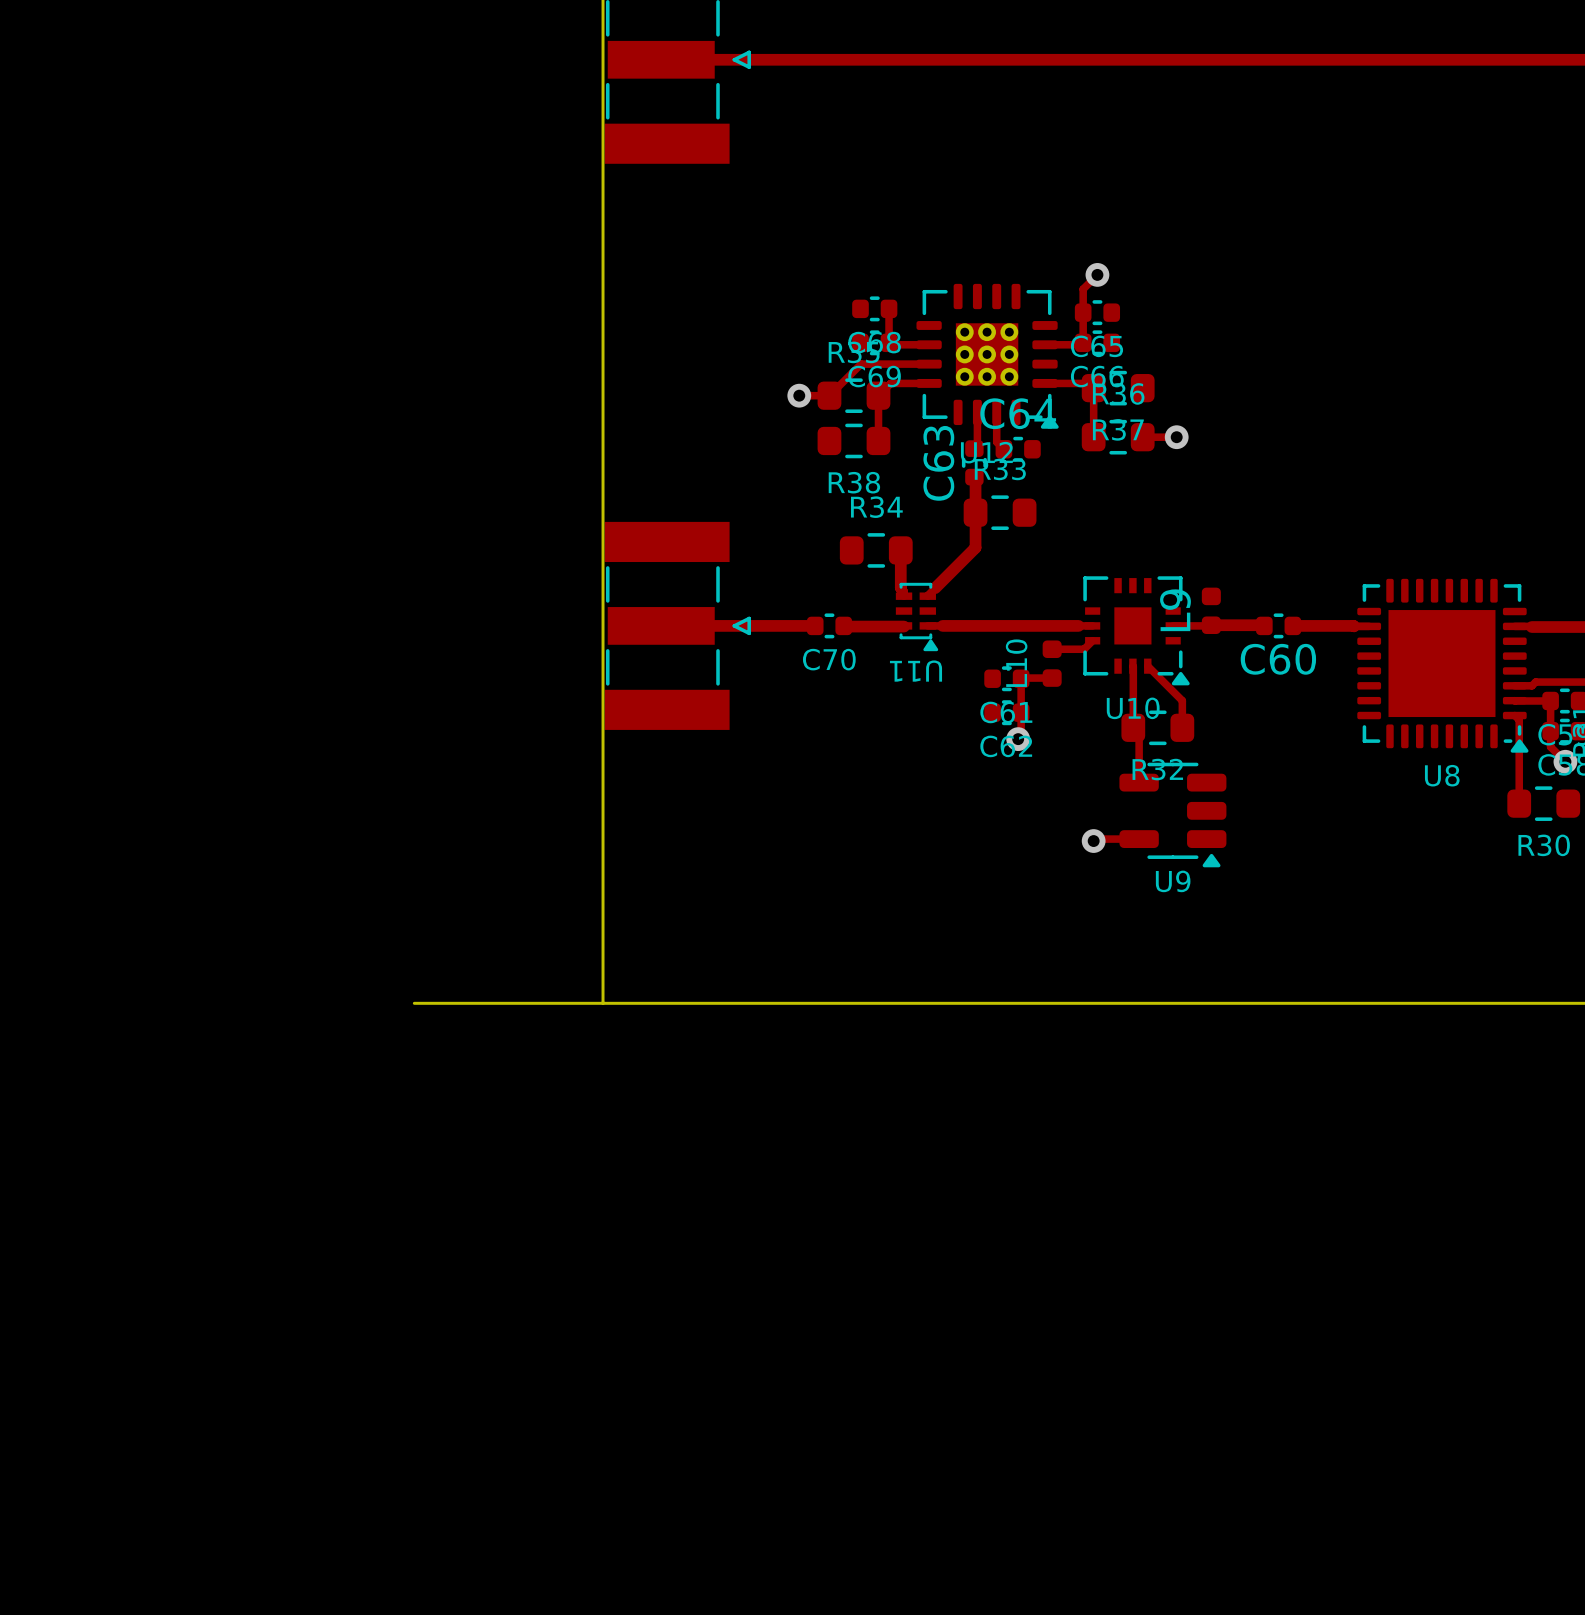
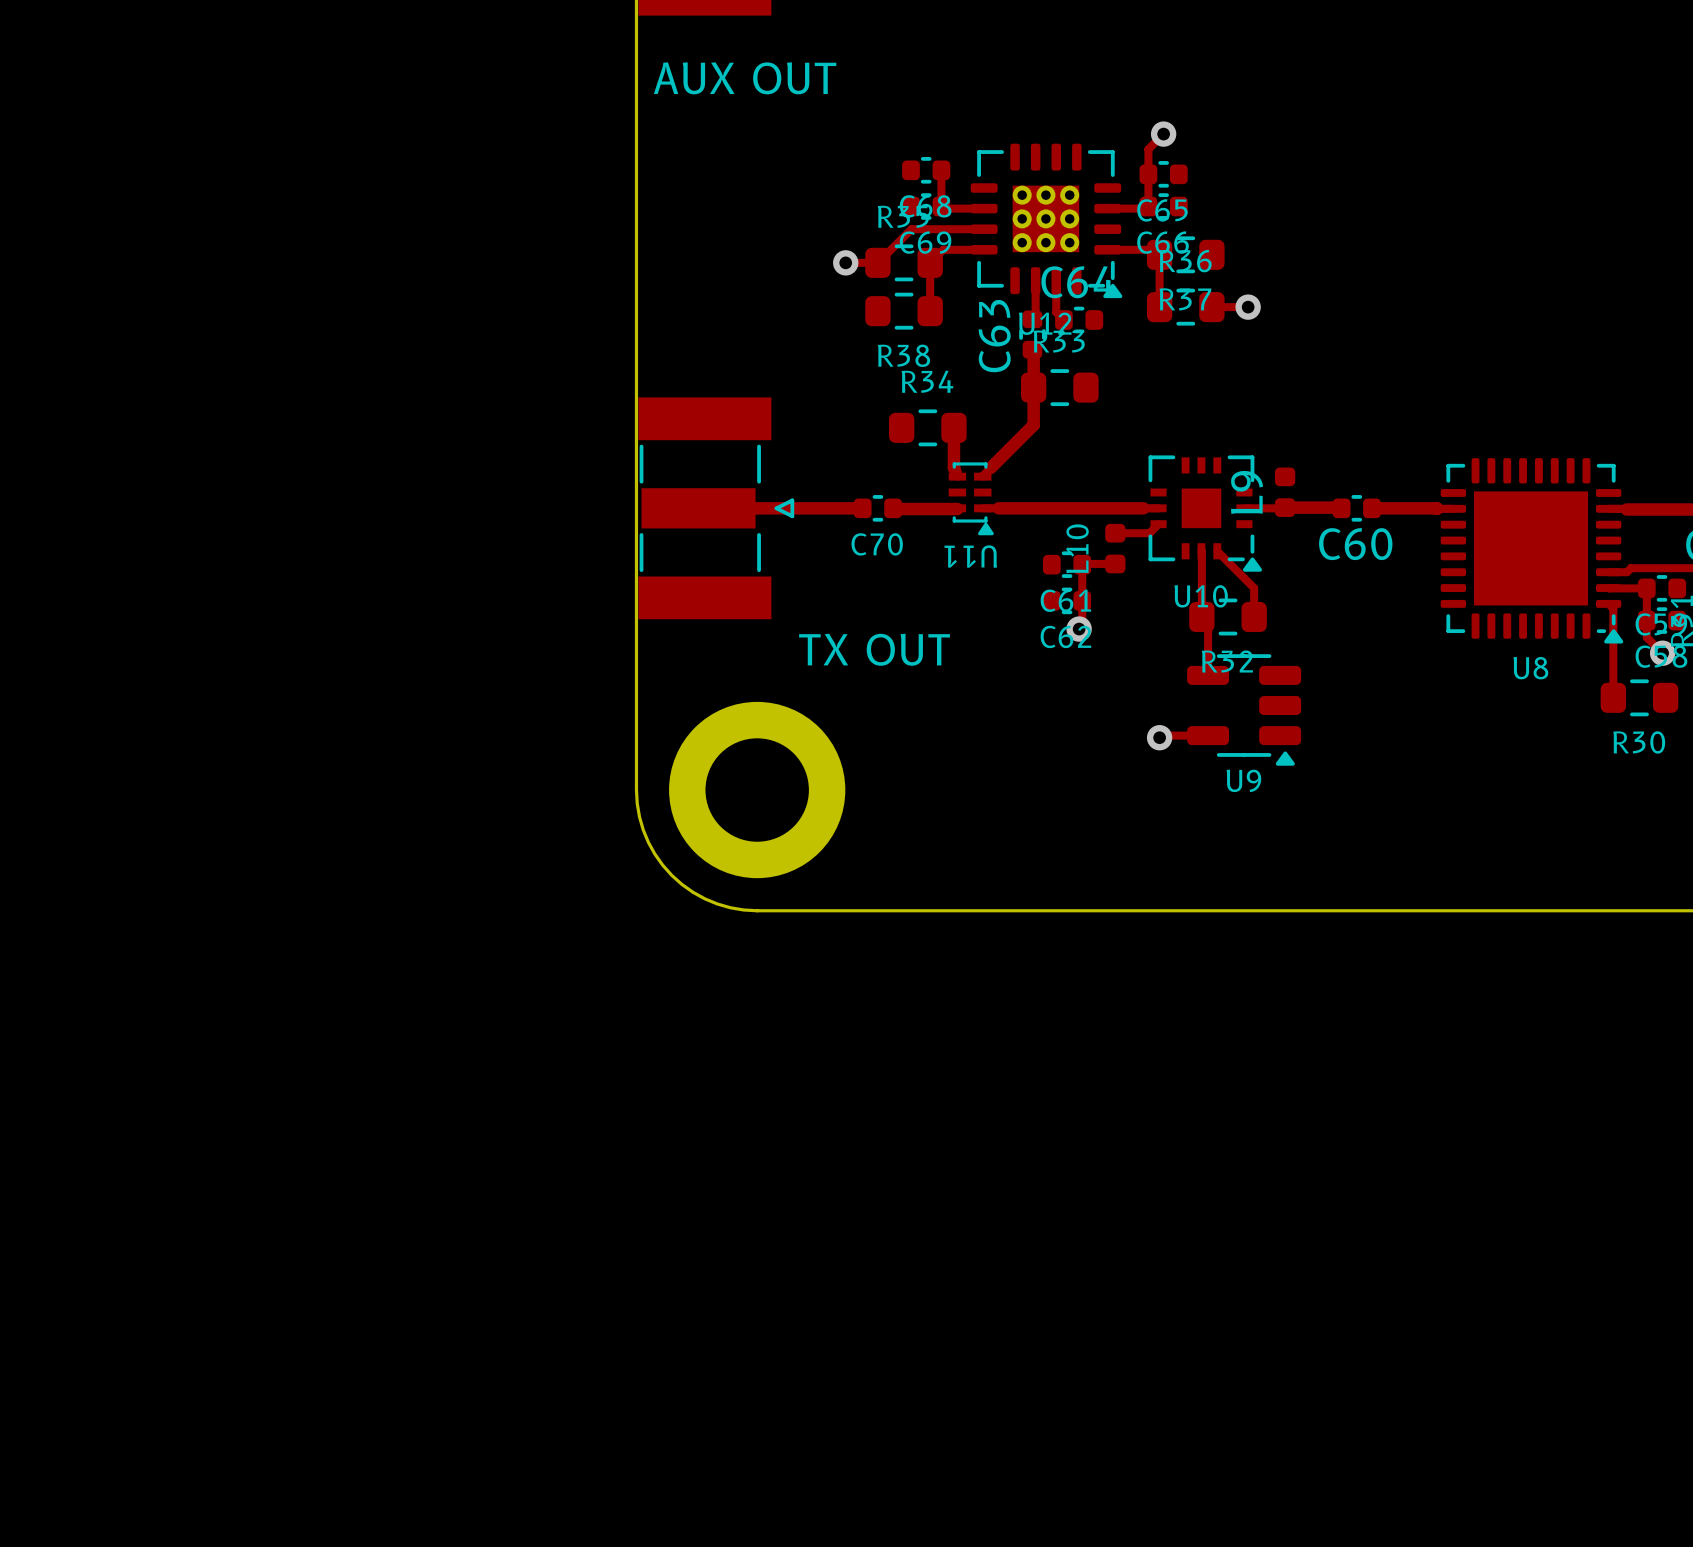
text: none -> AUX OUT (745, 78)
text: none -> TX OUT (874, 649)
board edge: (603, 890) (603, 1003) -> (636, 790) (639, 816) (648, 842) (662, 865) (671, 875) (681, 884) (704, 898) (730, 907) (757, 910)
part: none -> (757, 790)
board edge: (414, 1003) (716, 1003) -> none

